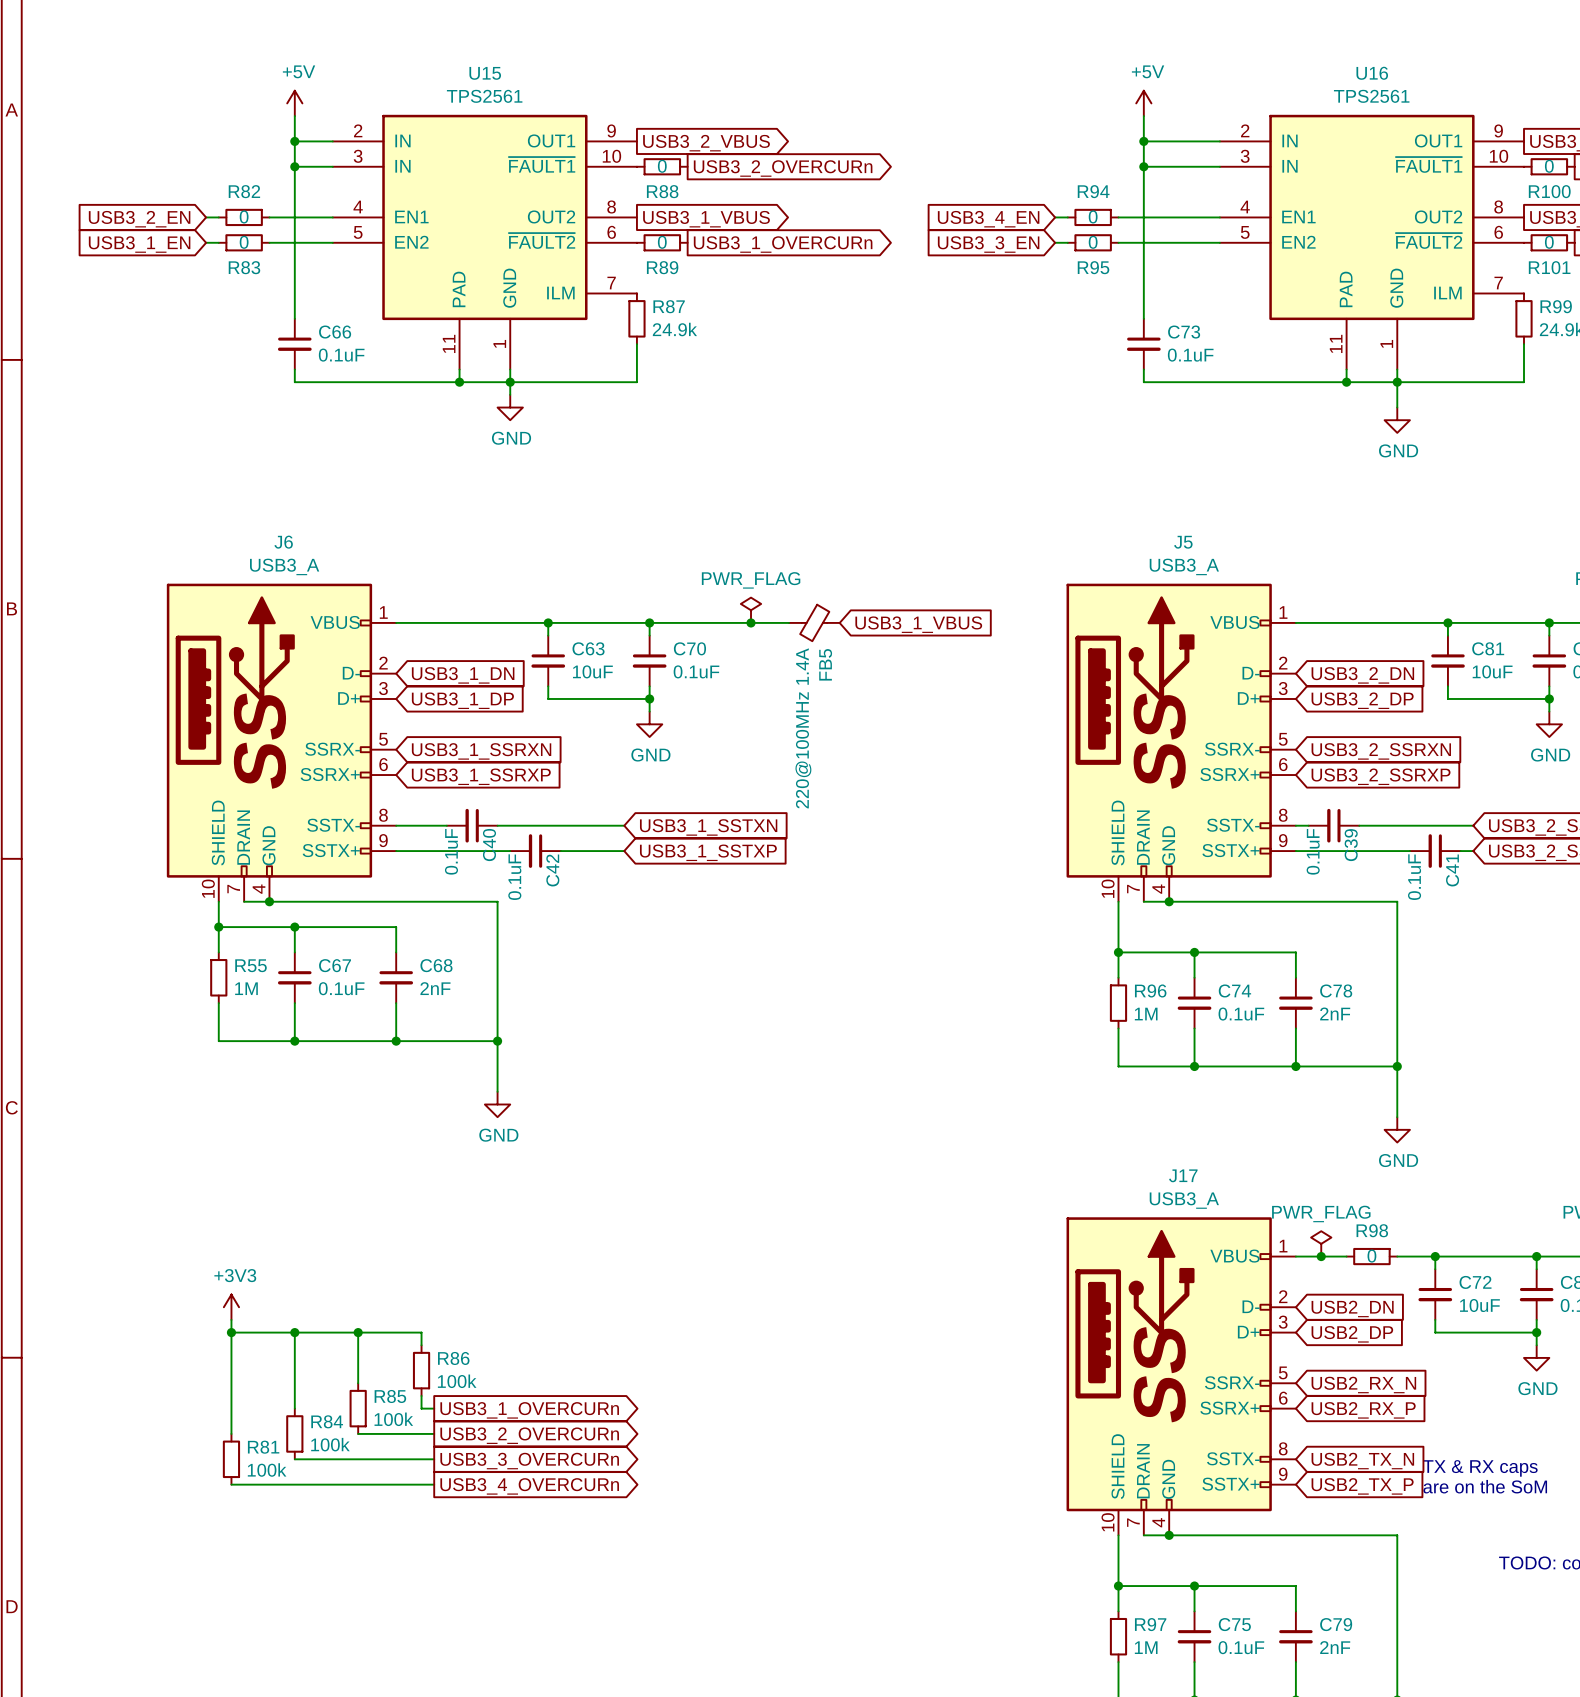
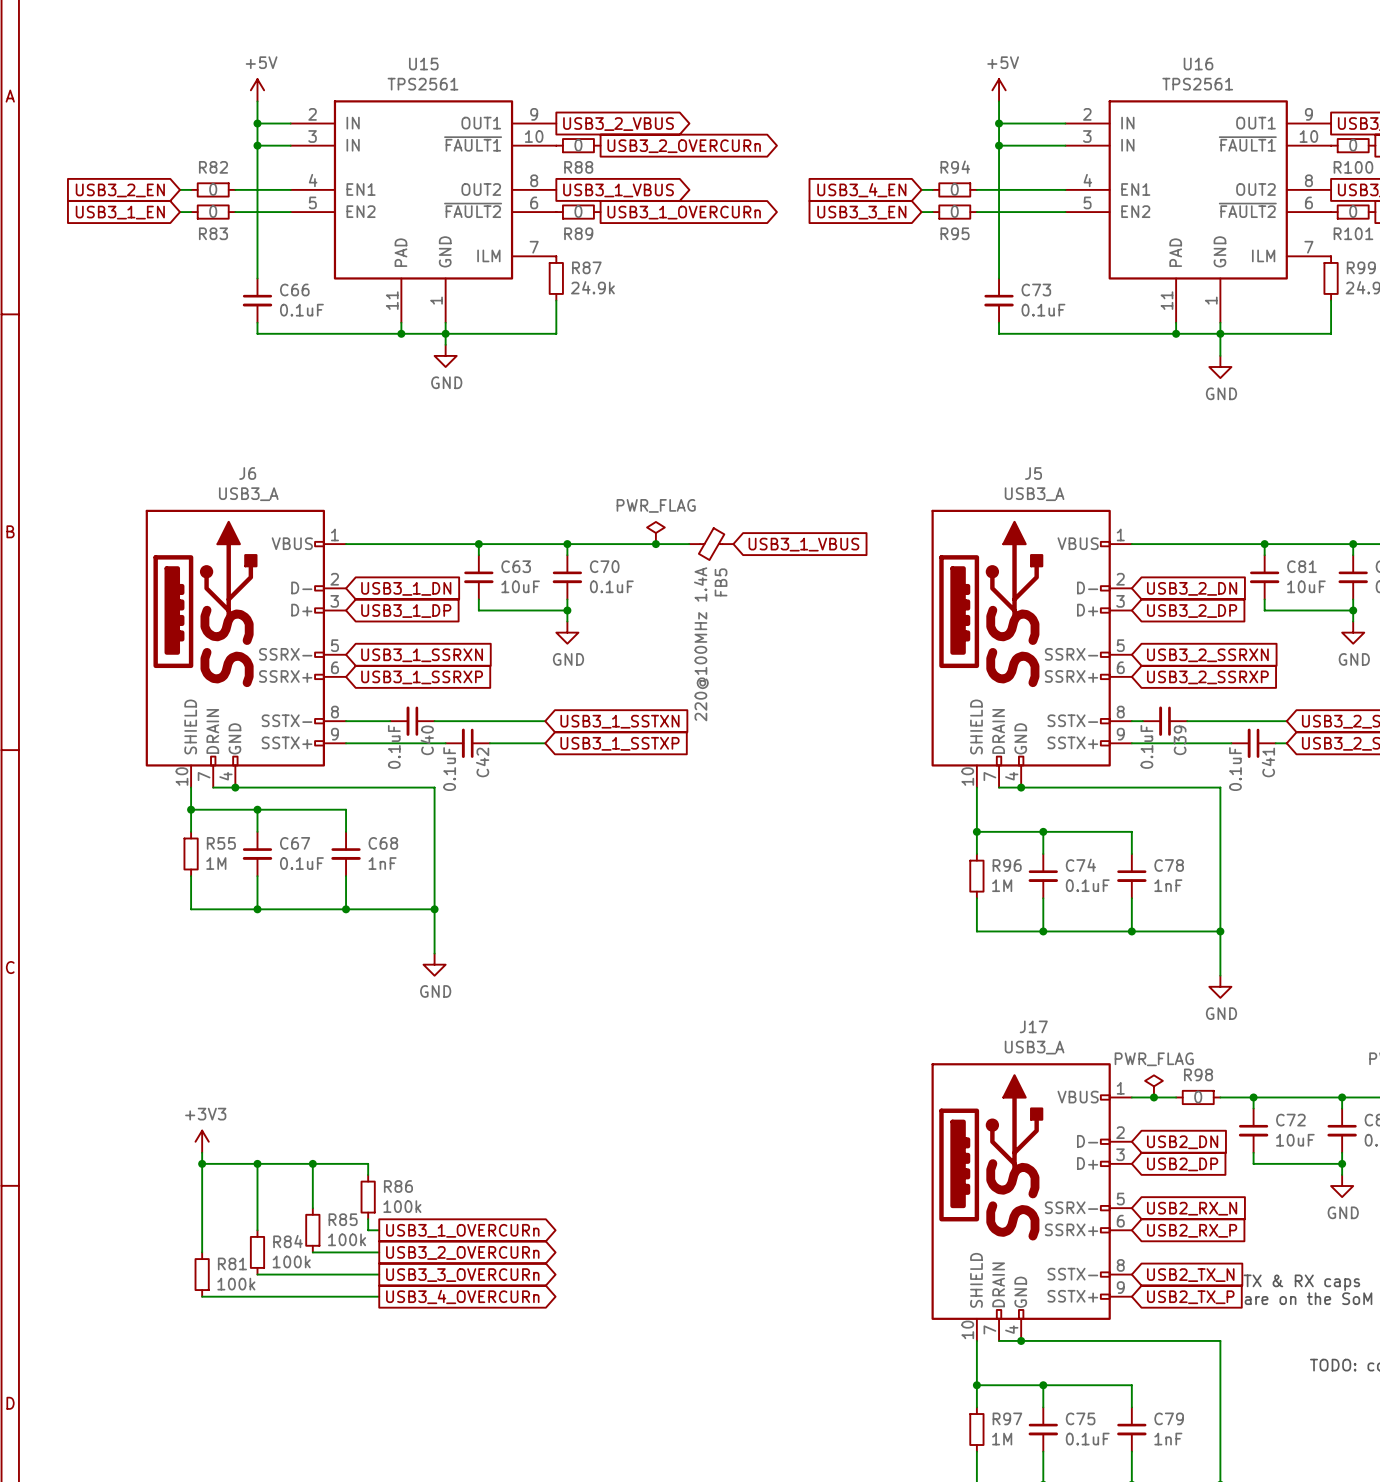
C68 value: 2nF (435, 988) -> 1nF (382, 863)
C78 value: 2nF (1335, 1013) -> 1nF (1168, 885)
C79 value: 2nF (1335, 1647) -> 1nF (1168, 1439)

